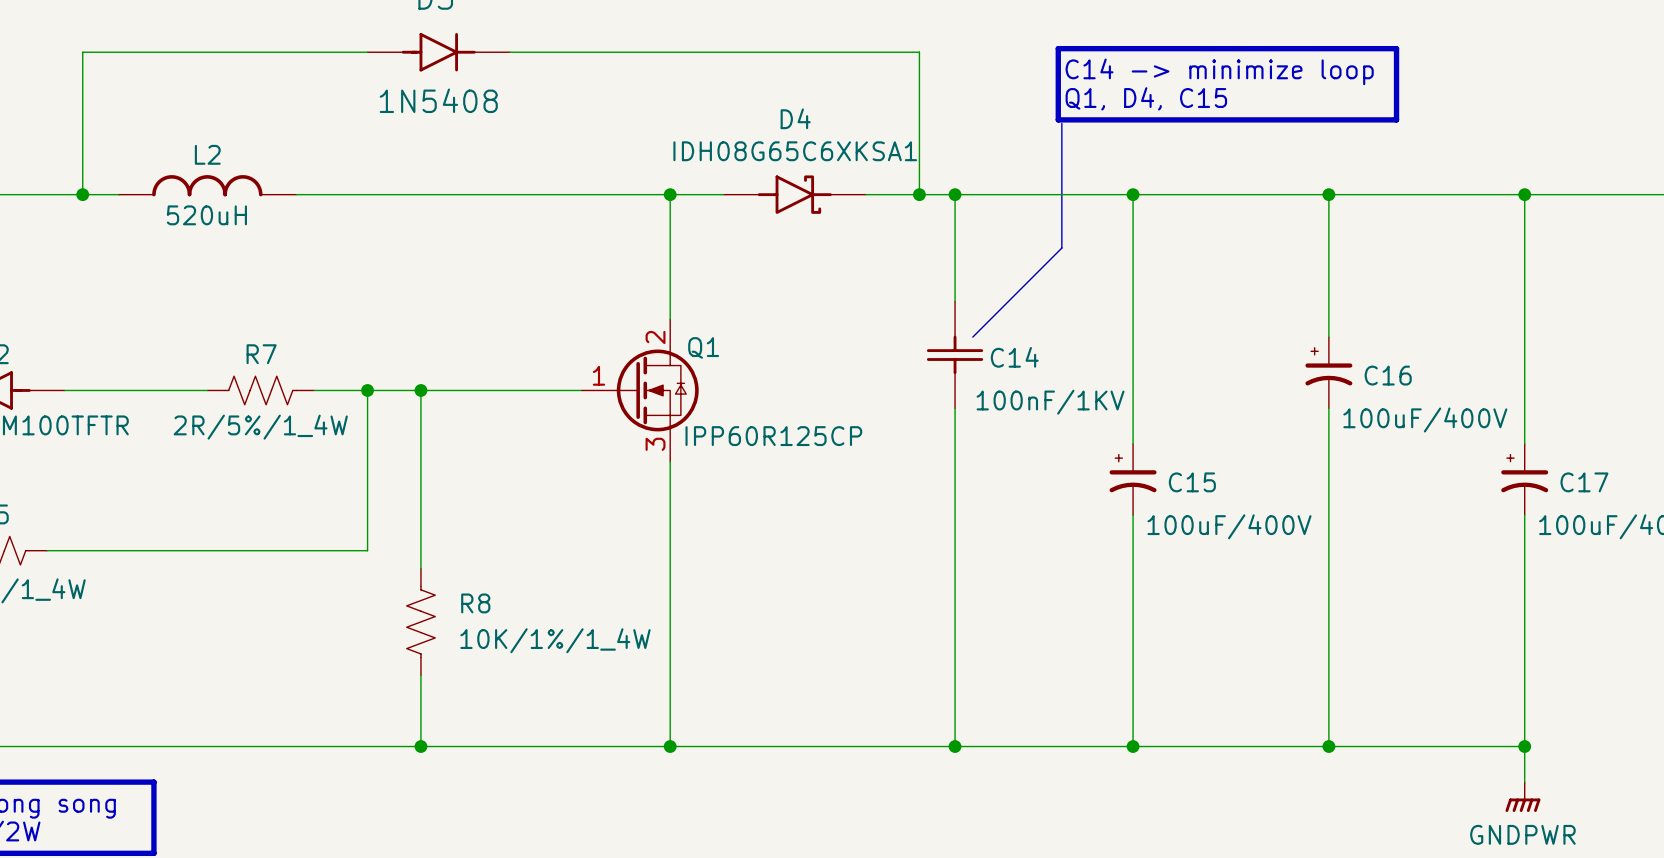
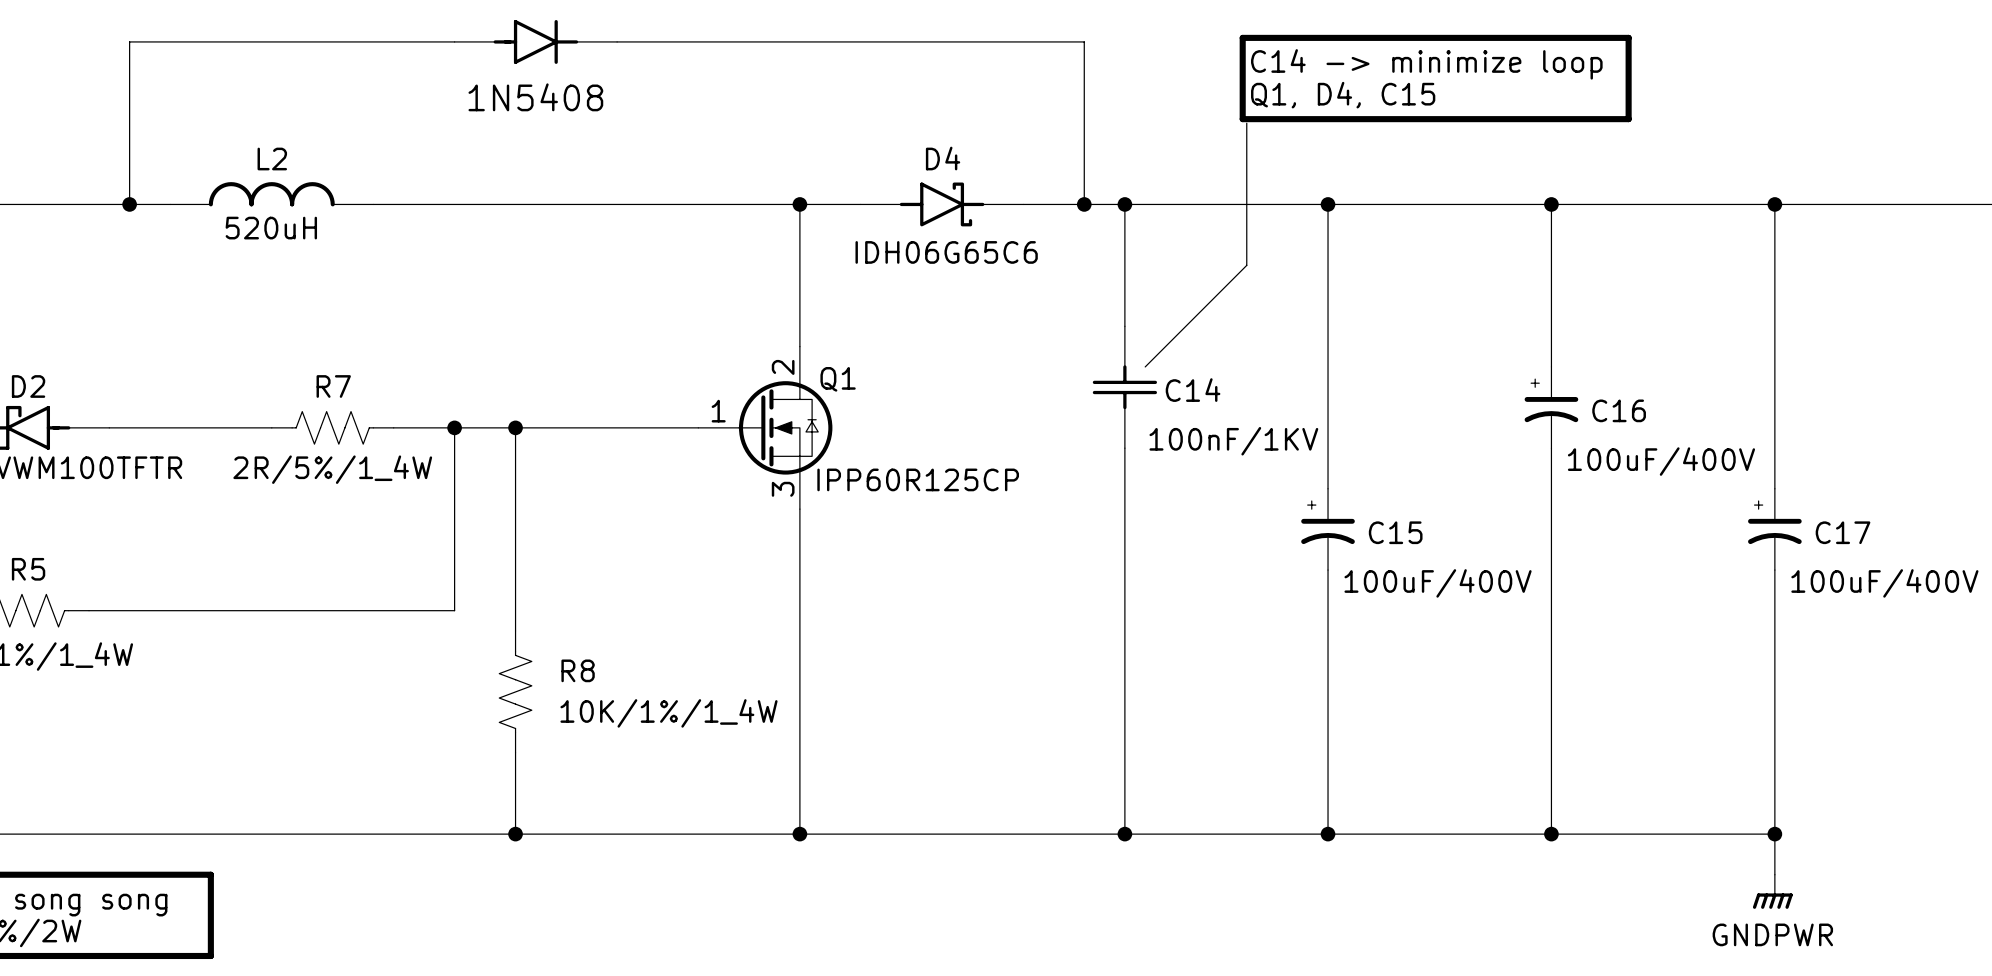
D4 name position: D4 (795, 118) -> D4 (943, 158)
D4 value: IDH08G65C6XKSA1 (795, 151) -> IDH06G65C6 (946, 252)

